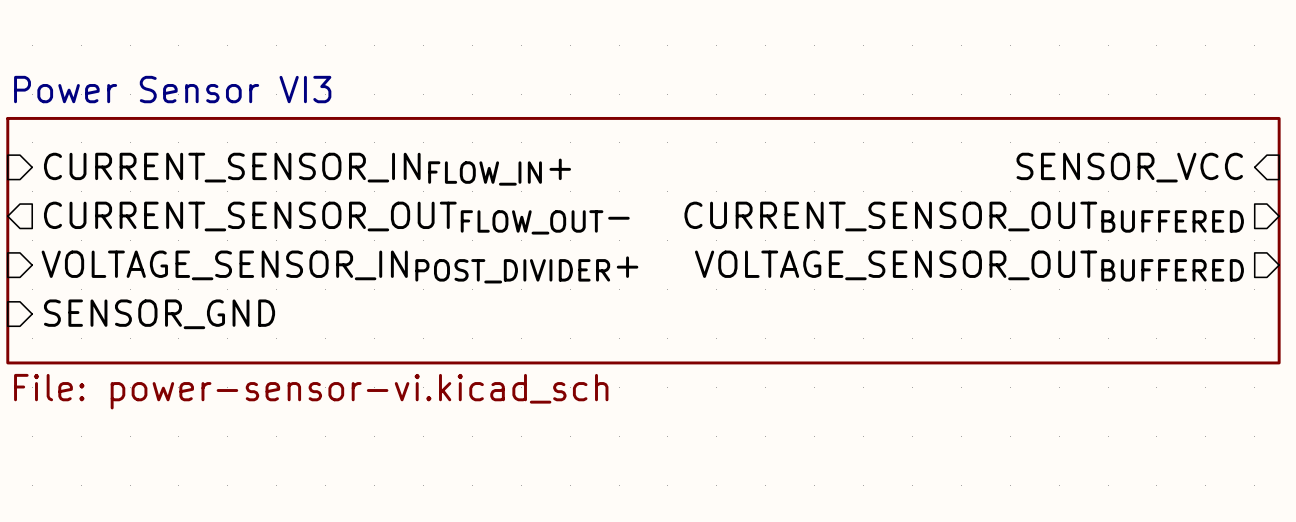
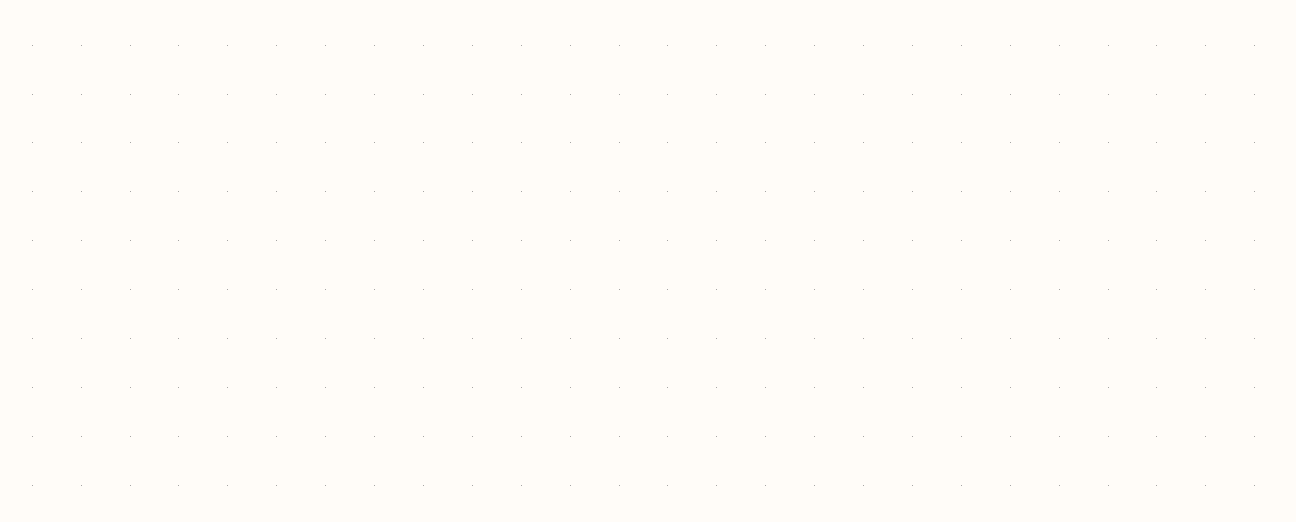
sheet pin: SENSOR_VCC (1129, 167) -> none
sheet pin: CURRENT_SENSOR_INFLOW_IN+ (307, 169) -> none
sheet pin: CURRENT_SENSOR_OUTBUFFERED (964, 217) -> none
sheet pin: CURRENT_SENSOR_OUTFLOW_OUT- (336, 218) -> none
sheet Power Sensor VI3: File: power-sensor-vi.kicad_sch (643, 240) -> none
sheet pin: VOLTAGE_SENSOR_OUTBUFFERED (969, 266) -> none
sheet pin: VOLTAGE_SENSOR_INPOST_DIVIDER+ (339, 267) -> none
sheet pin: SENSOR_GND (159, 314) -> none

